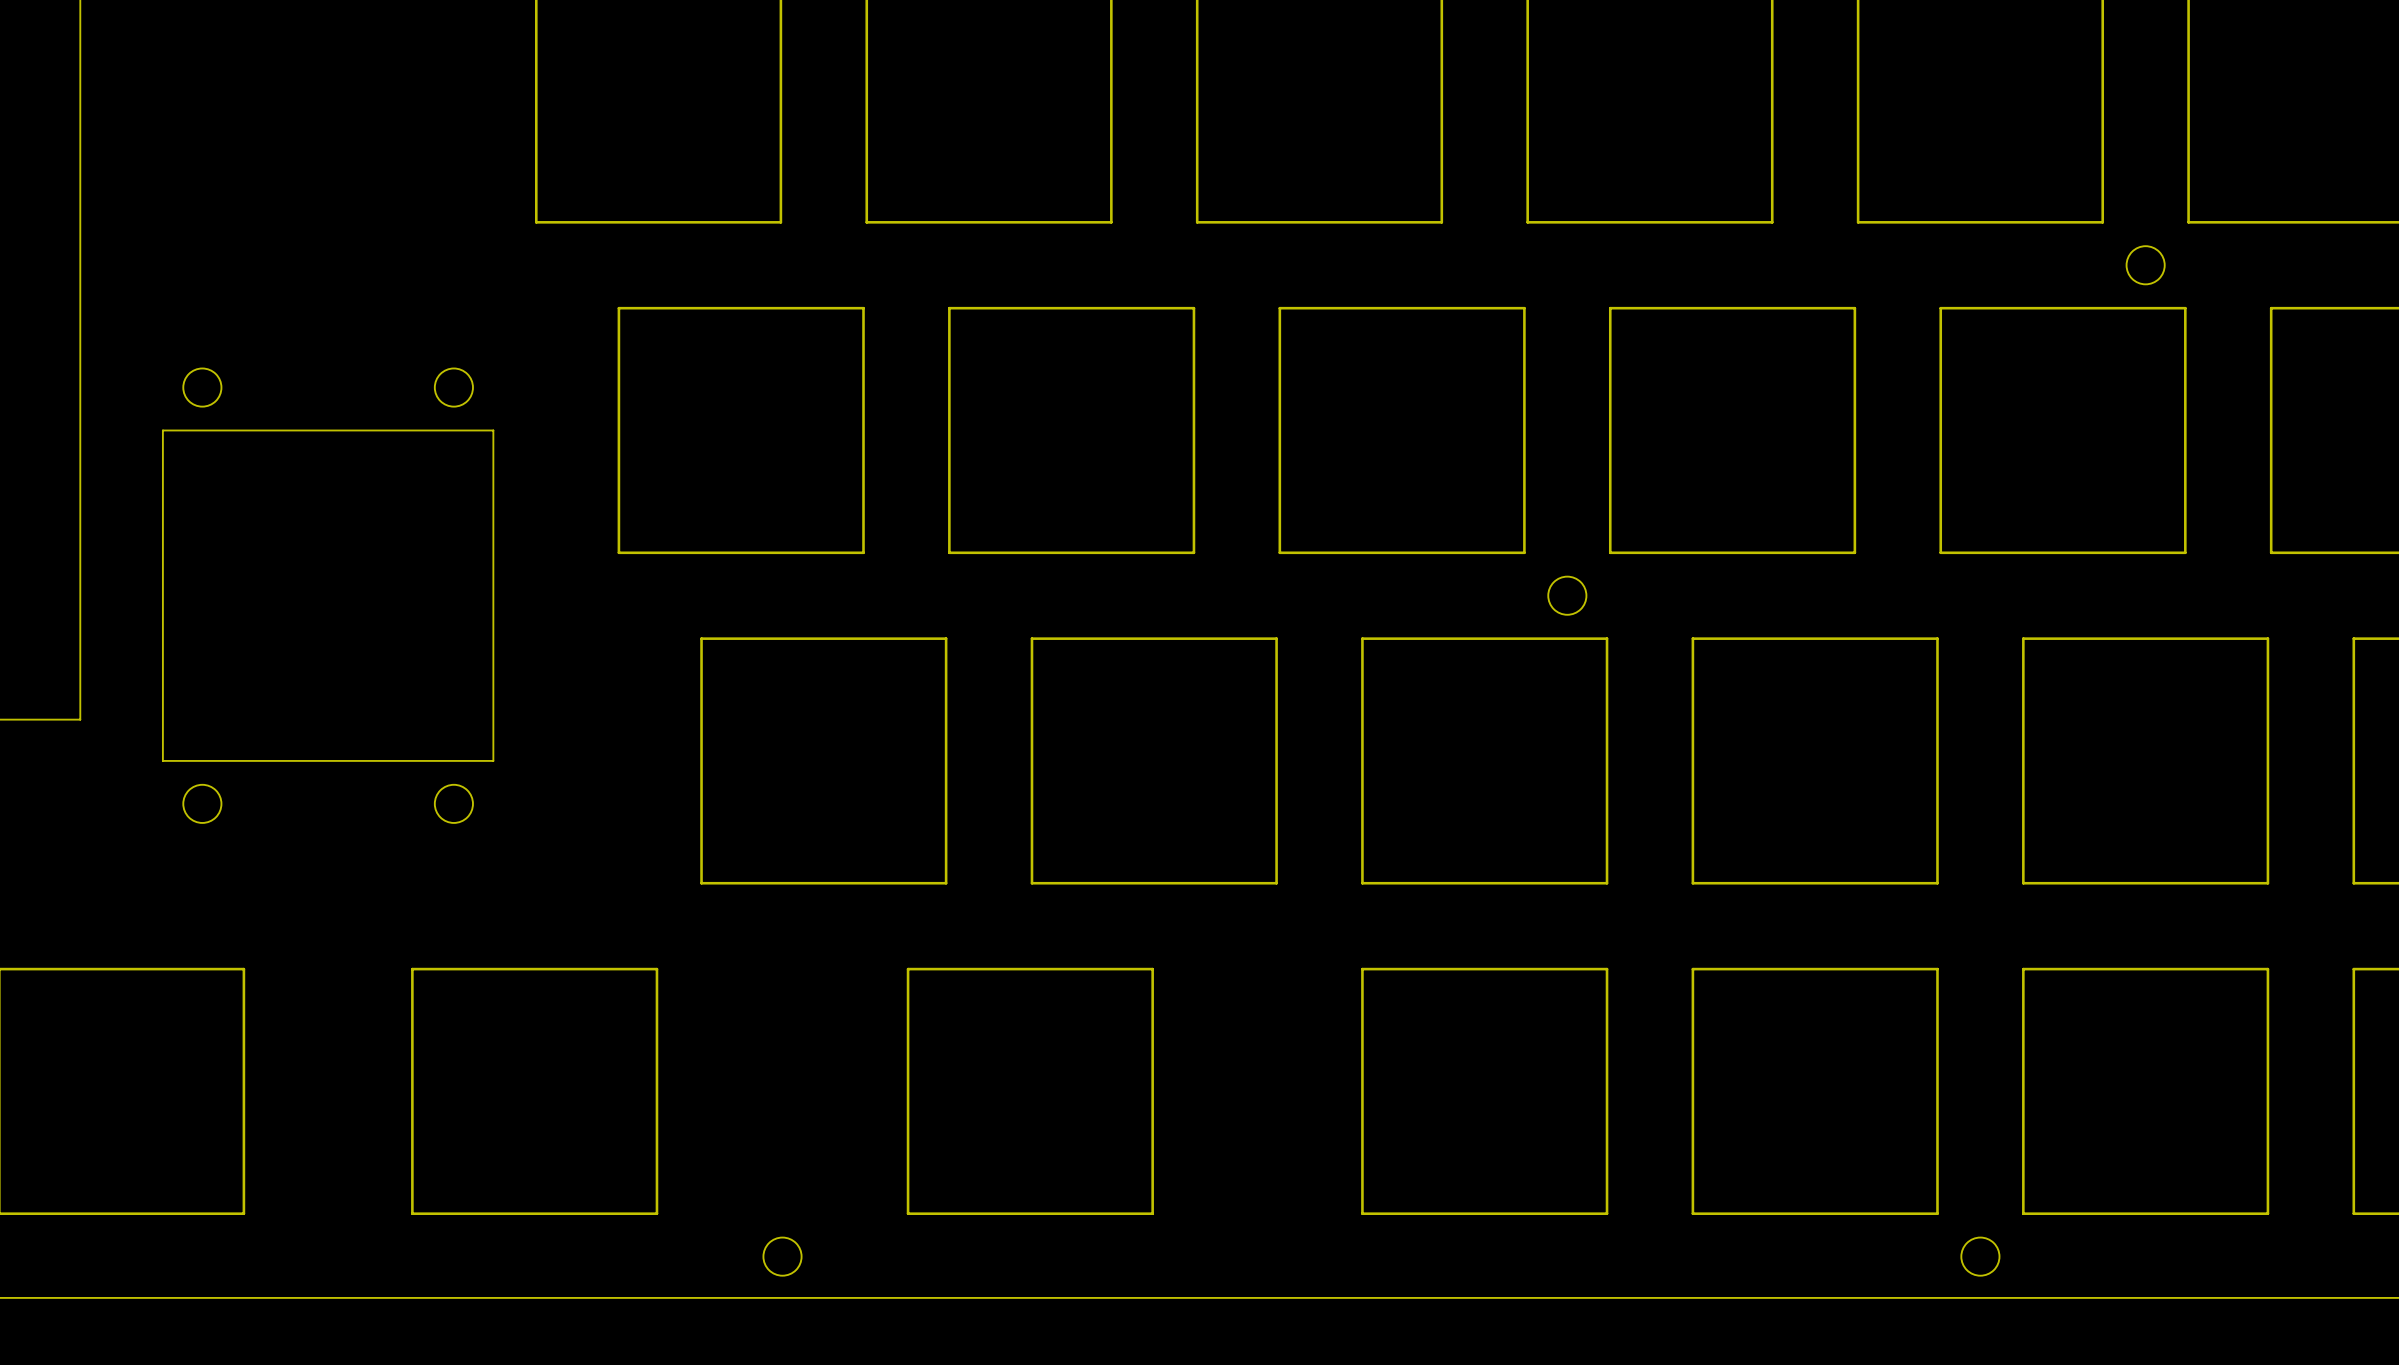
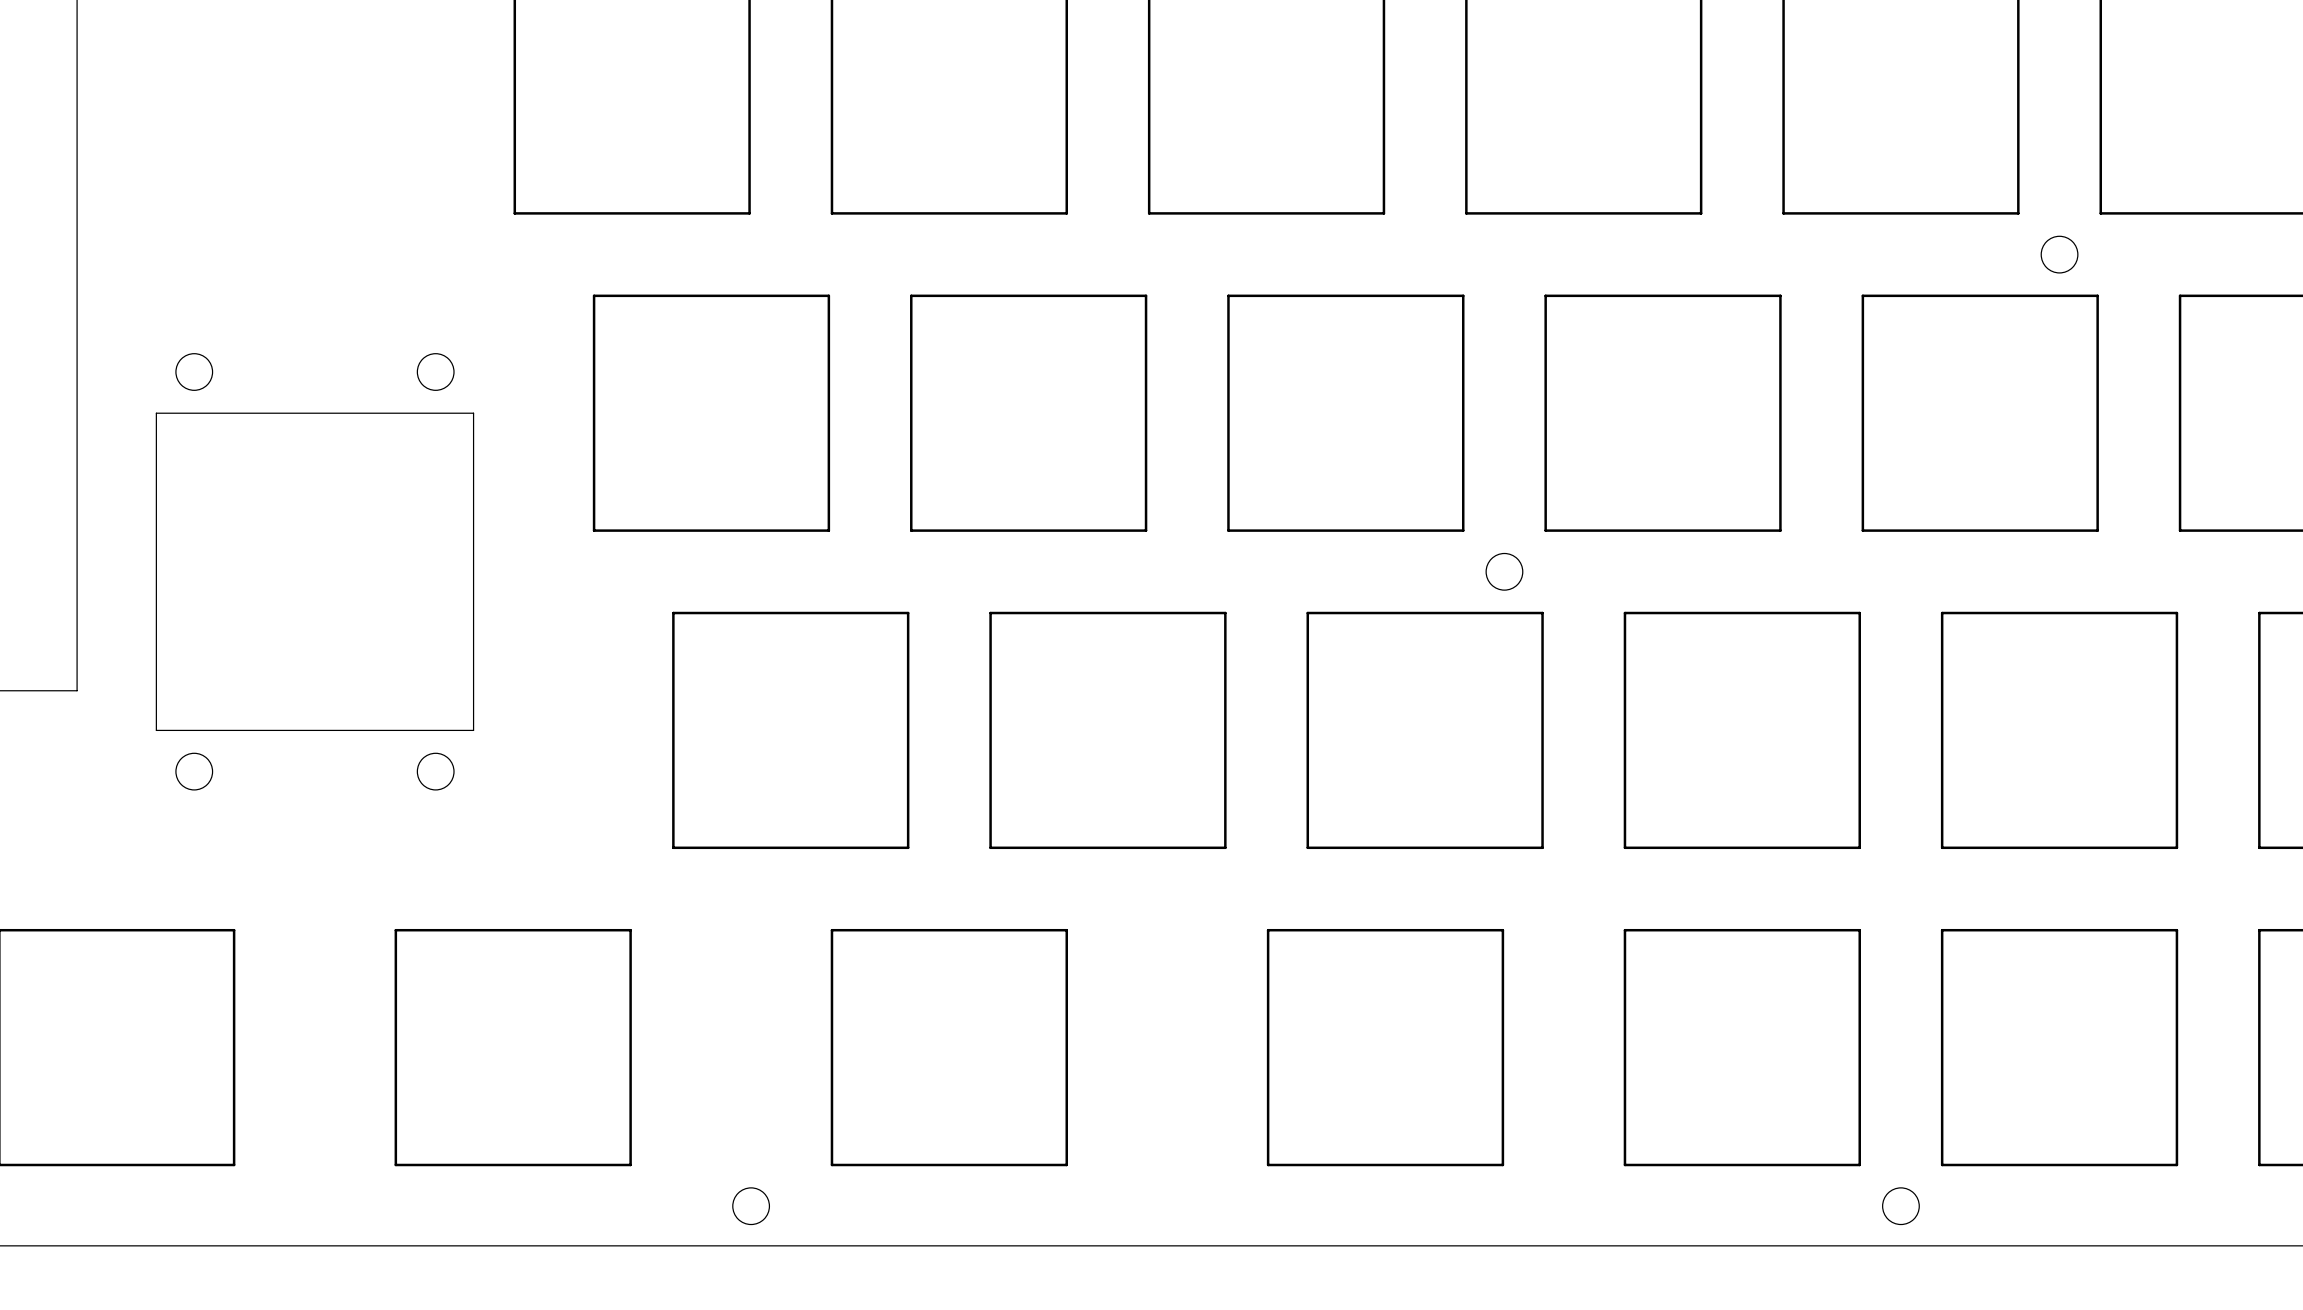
drawing position: (1030, 1091) -> (949, 1047)
drawing position: (1484, 1091) -> (1385, 1047)

